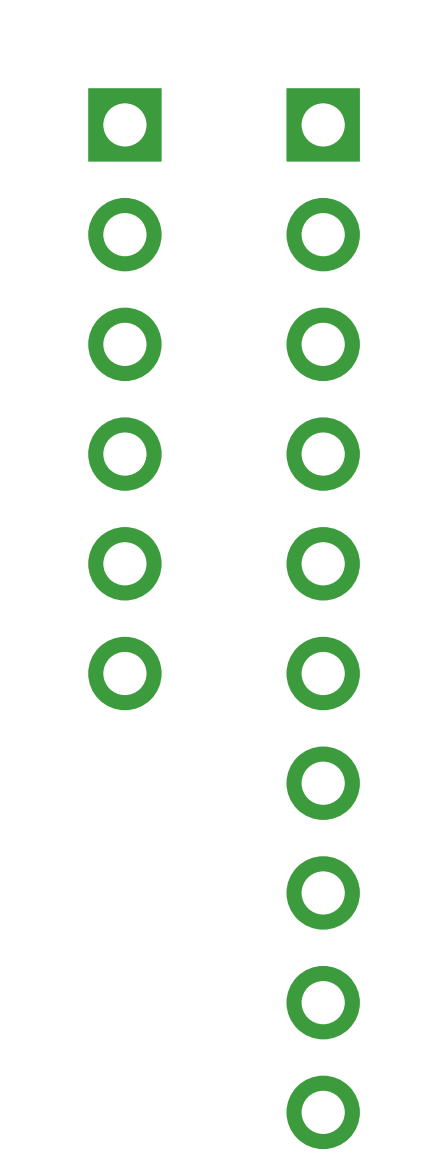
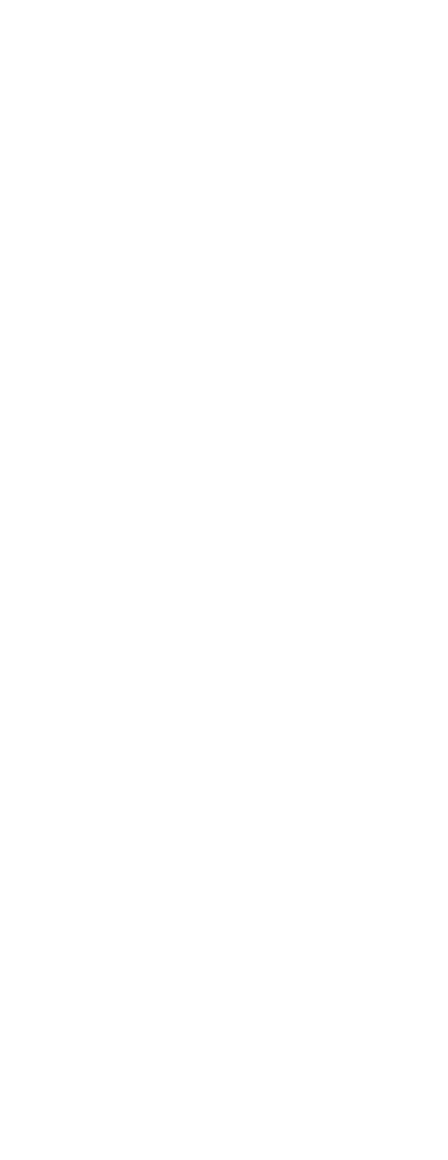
part: (124, 399) -> none
part: (323, 618) -> none

